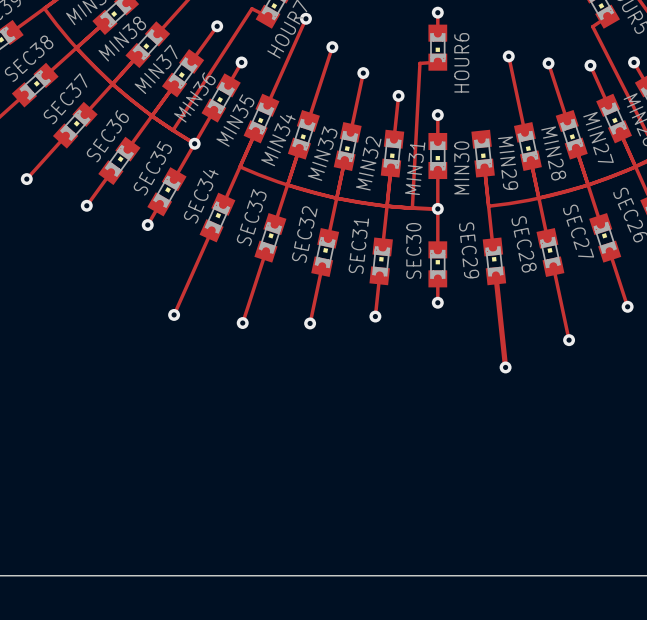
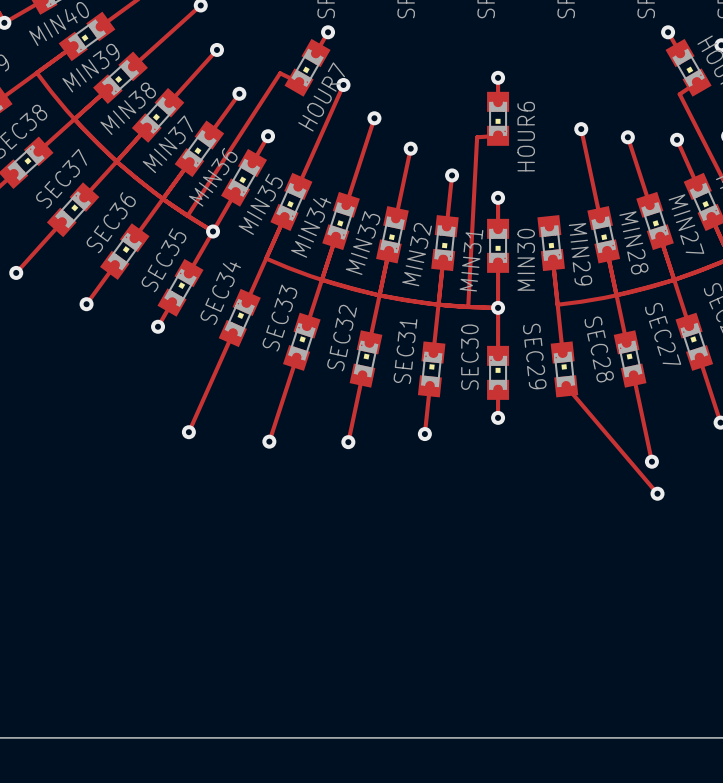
track: (495, 275) (505, 367) -> (566, 386) (657, 493)
via position: (505, 367) -> (657, 493)

